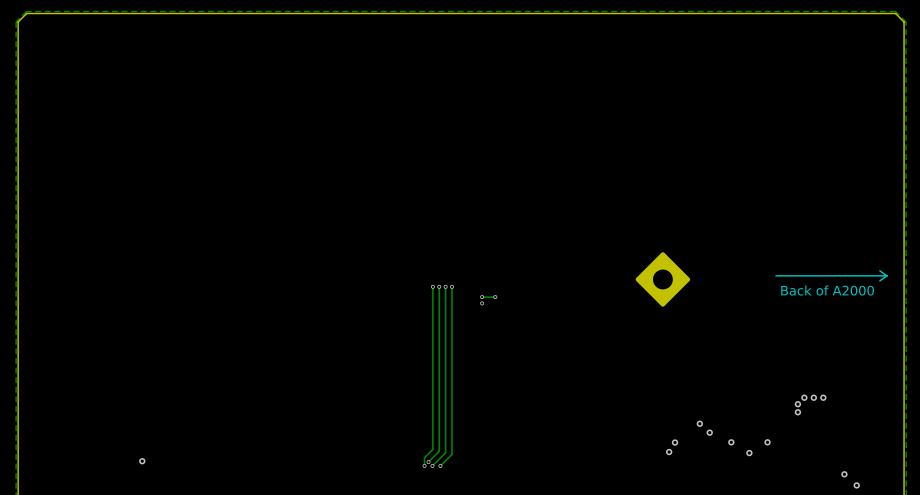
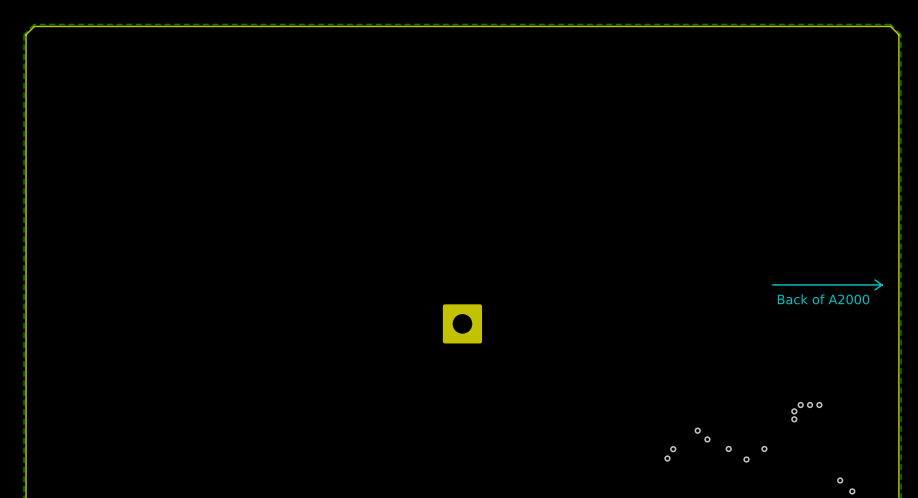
part: (662, 279) -> none
track: (432, 286) (432, 449) (424, 457) (424, 465) -> none
via: (432, 286) -> none
track: (439, 286) (439, 451) (428, 462) -> none
via: (439, 286) -> none
track: (445, 286) (445, 452) (432, 465) -> none
via: (445, 286) -> none
track: (451, 286) (451, 454) (440, 465) -> none
via: (451, 286) -> none
via: (482, 297) -> none
track: (495, 297) (482, 297) -> none
via: (495, 297) -> none
via: (482, 303) -> none
part: none -> (462, 323)
via: (142, 461) -> none
via: (428, 462) -> none
via: (424, 465) -> none
via: (432, 465) -> none
via: (440, 465) -> none

